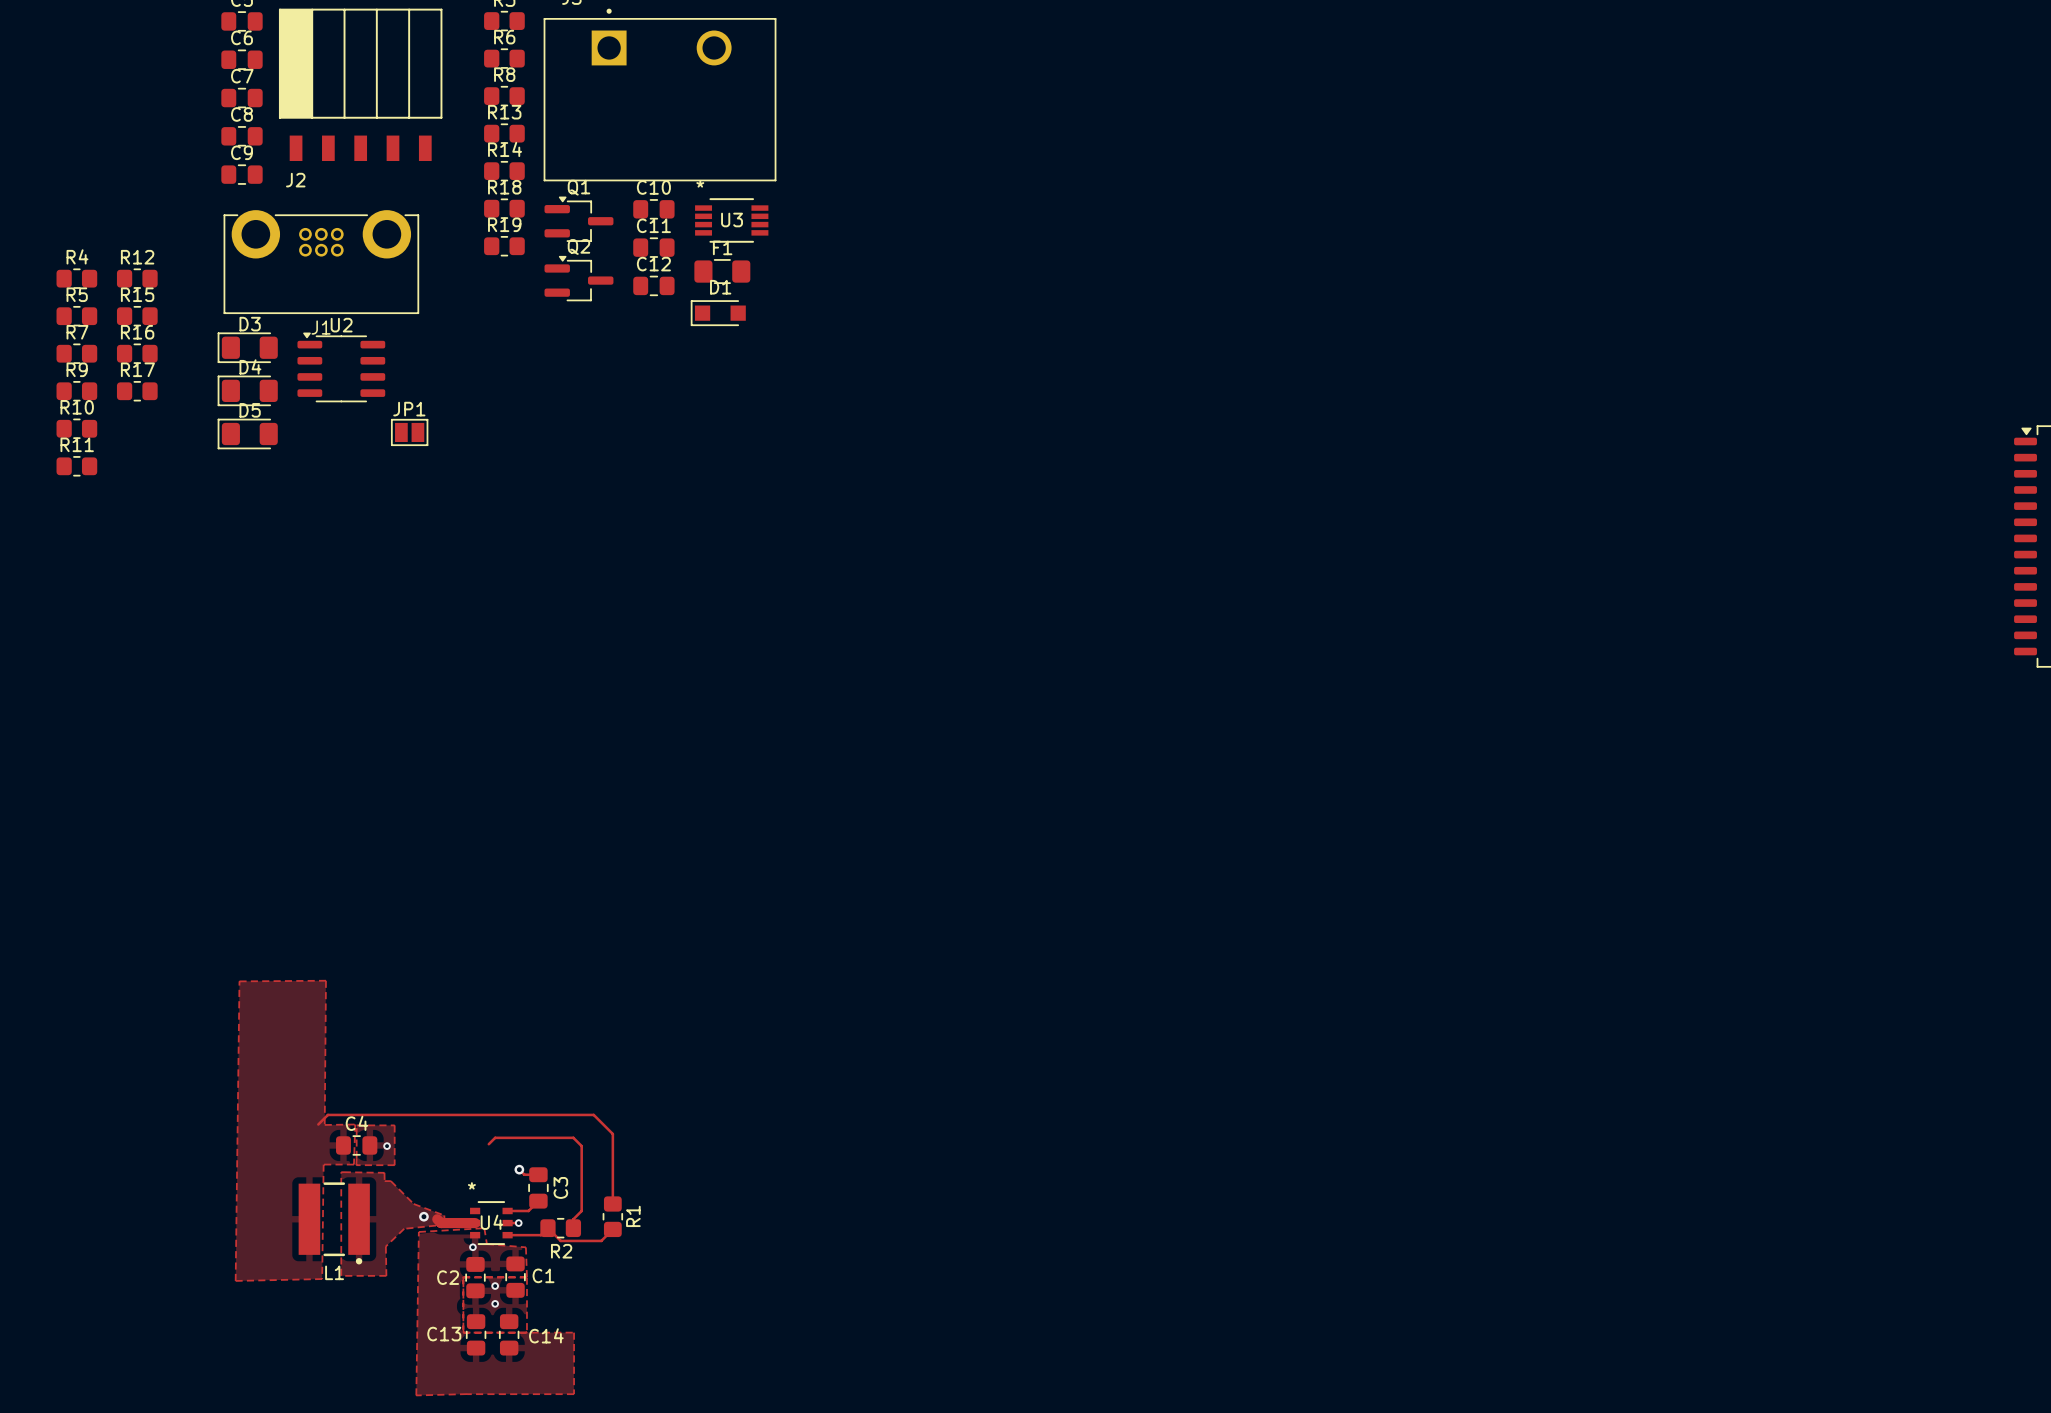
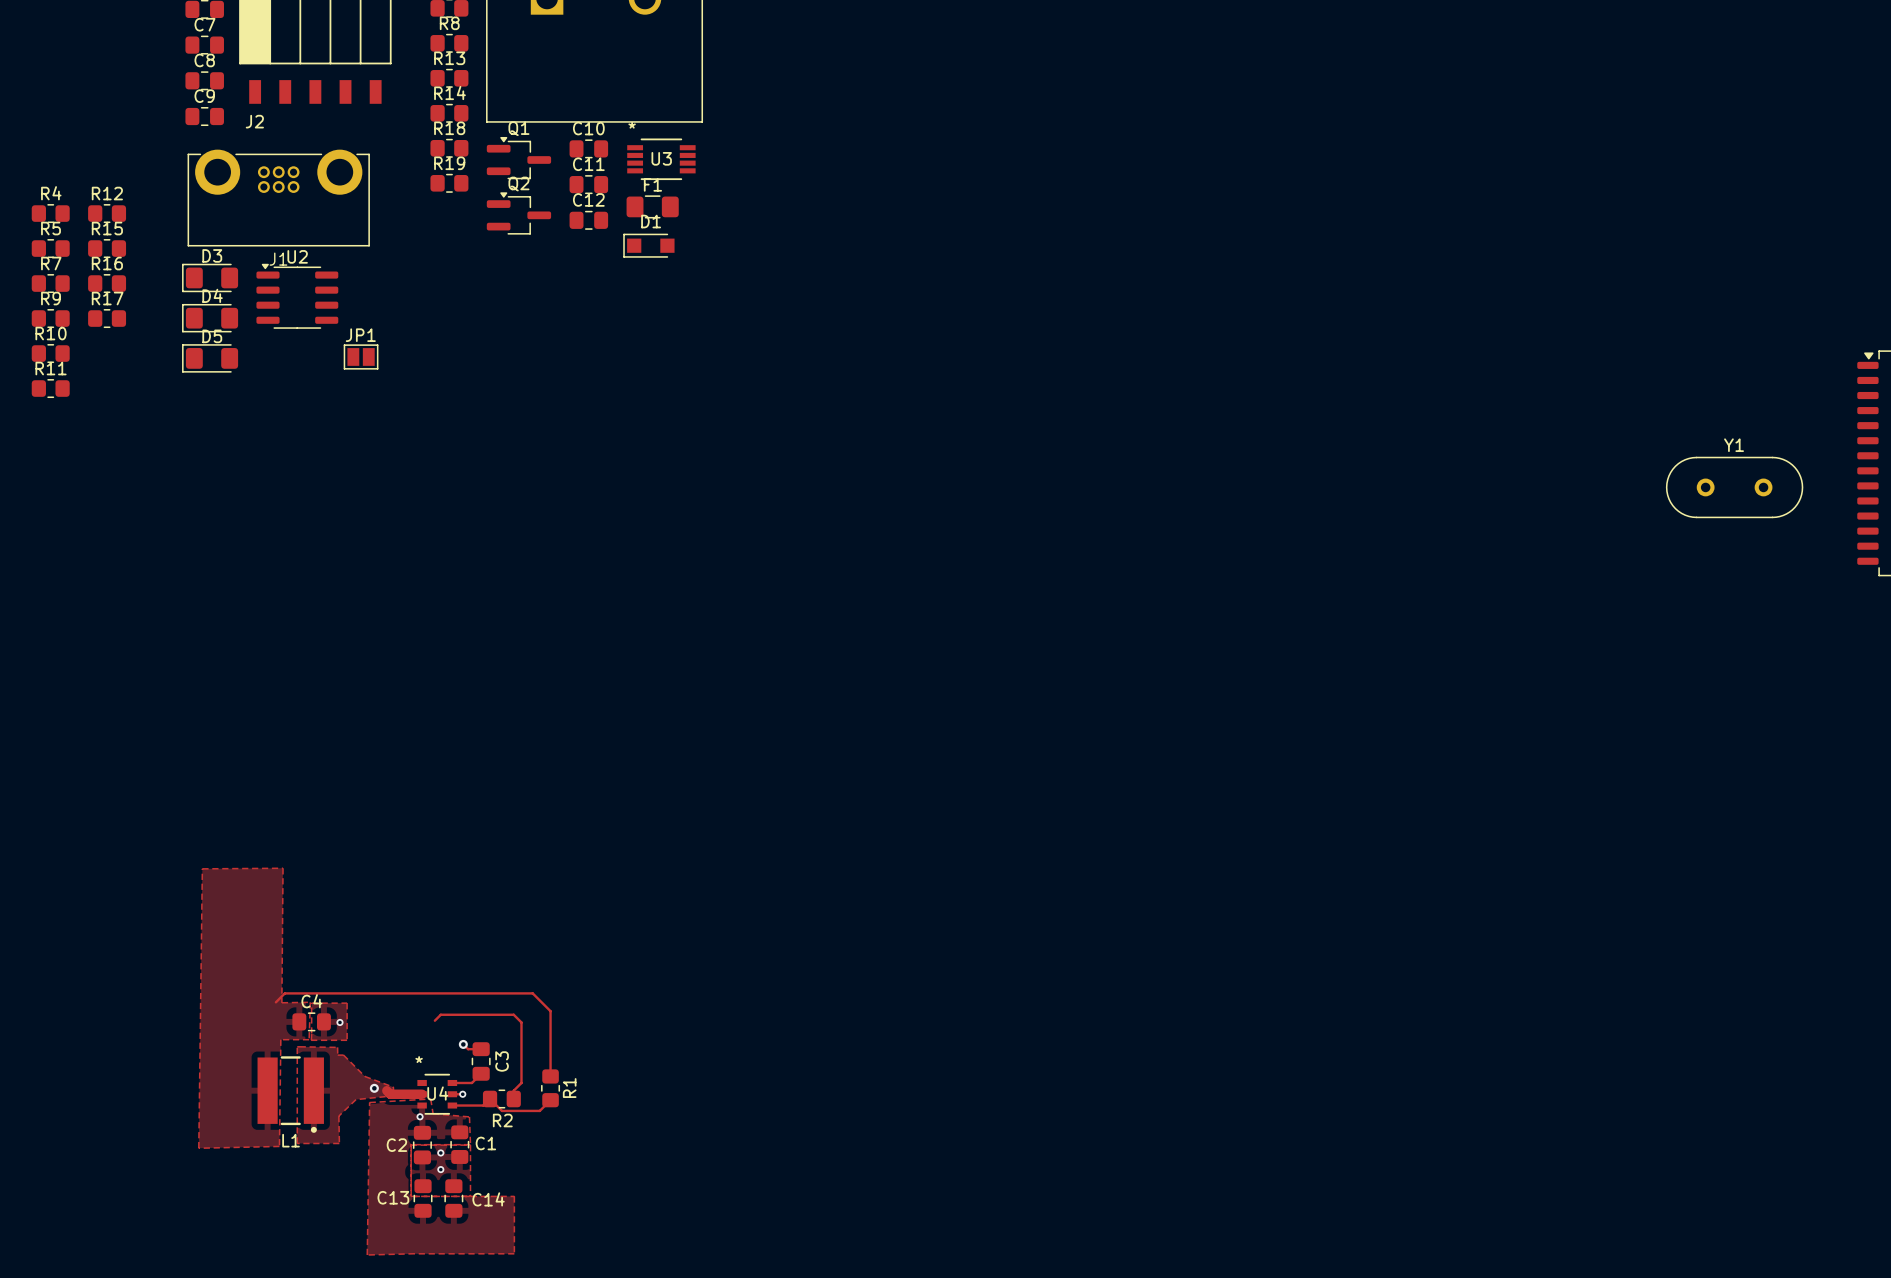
Y1: none -> (1734, 487)

